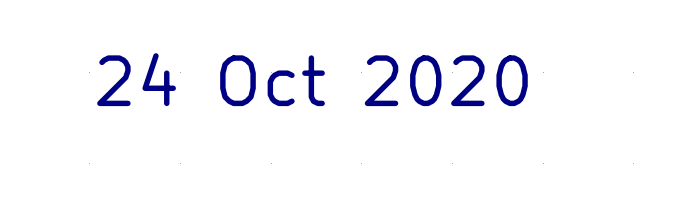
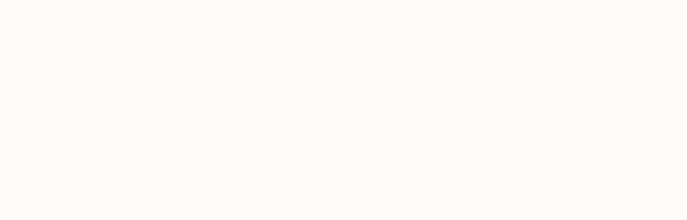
text: 24 Oct 2020 (312, 79) -> none

